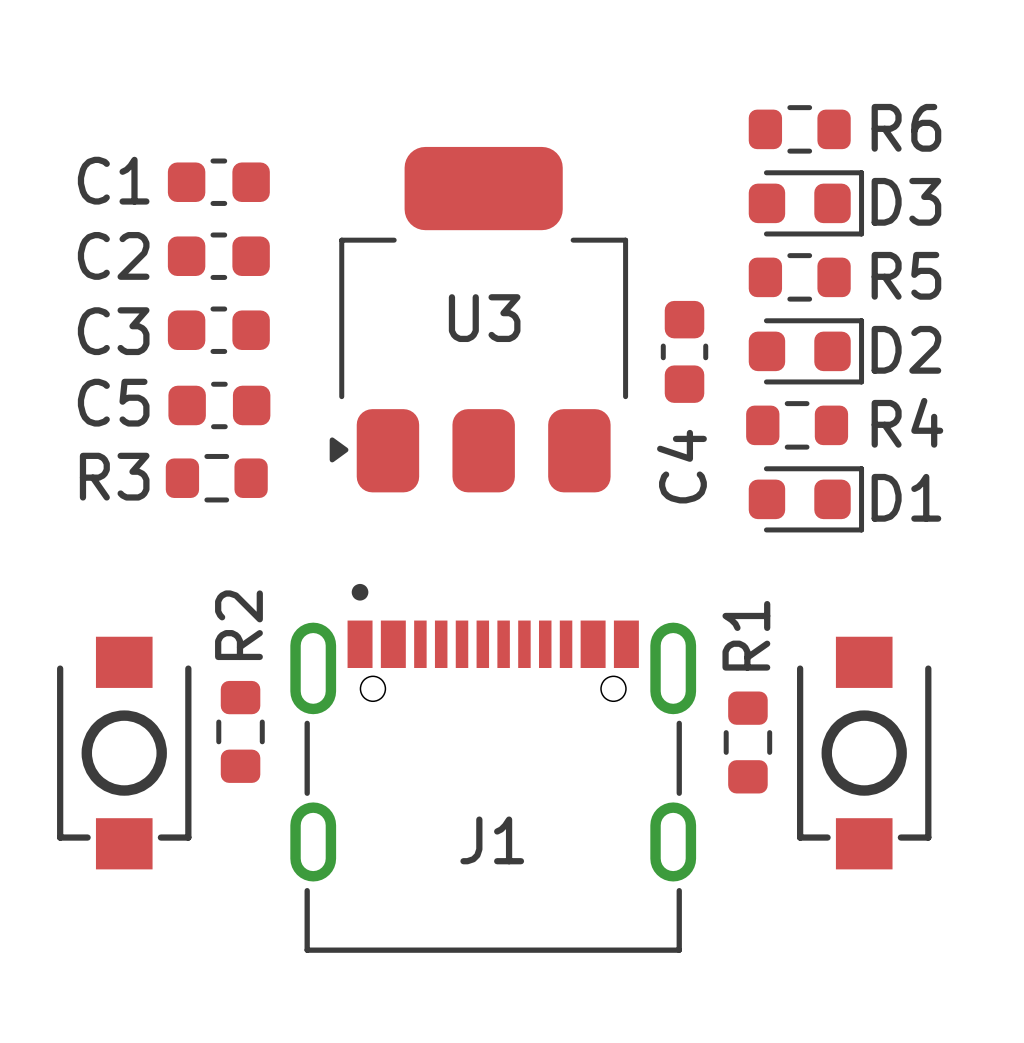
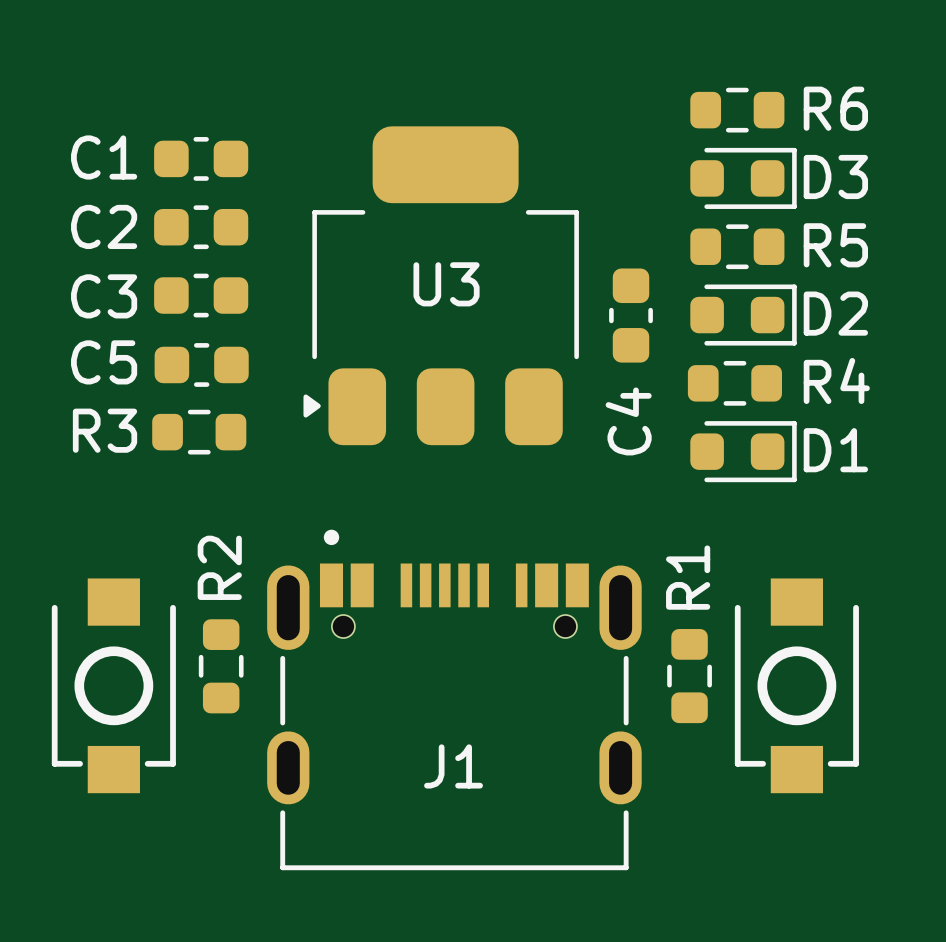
J1 footprint: [290, 583, 697, 953] -> [267, 529, 642, 871]

